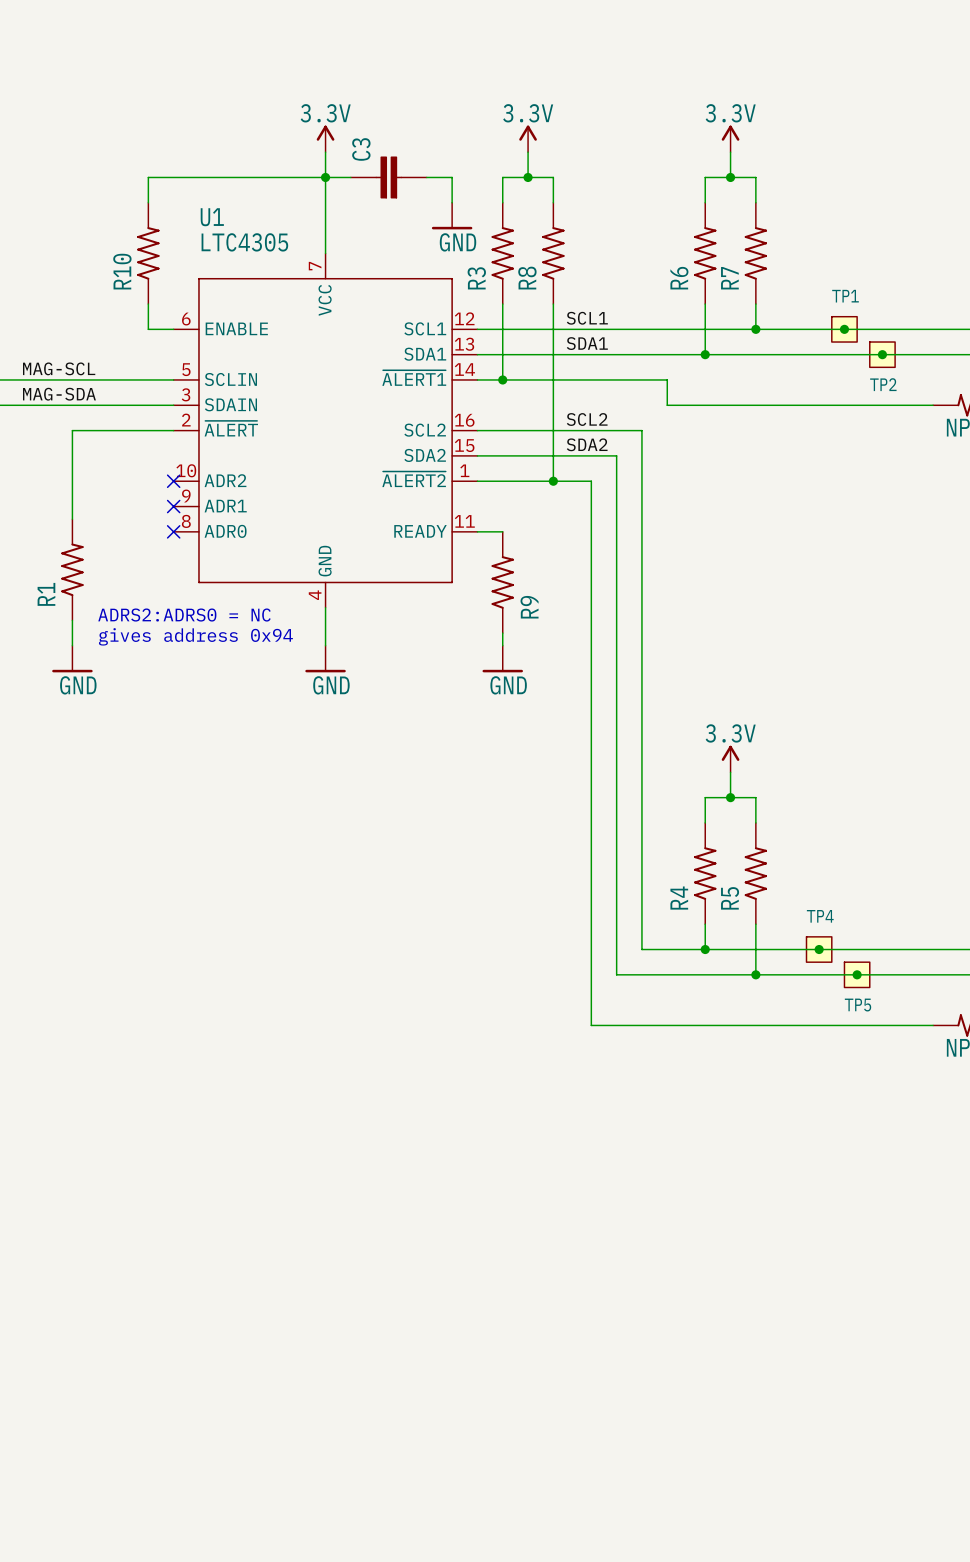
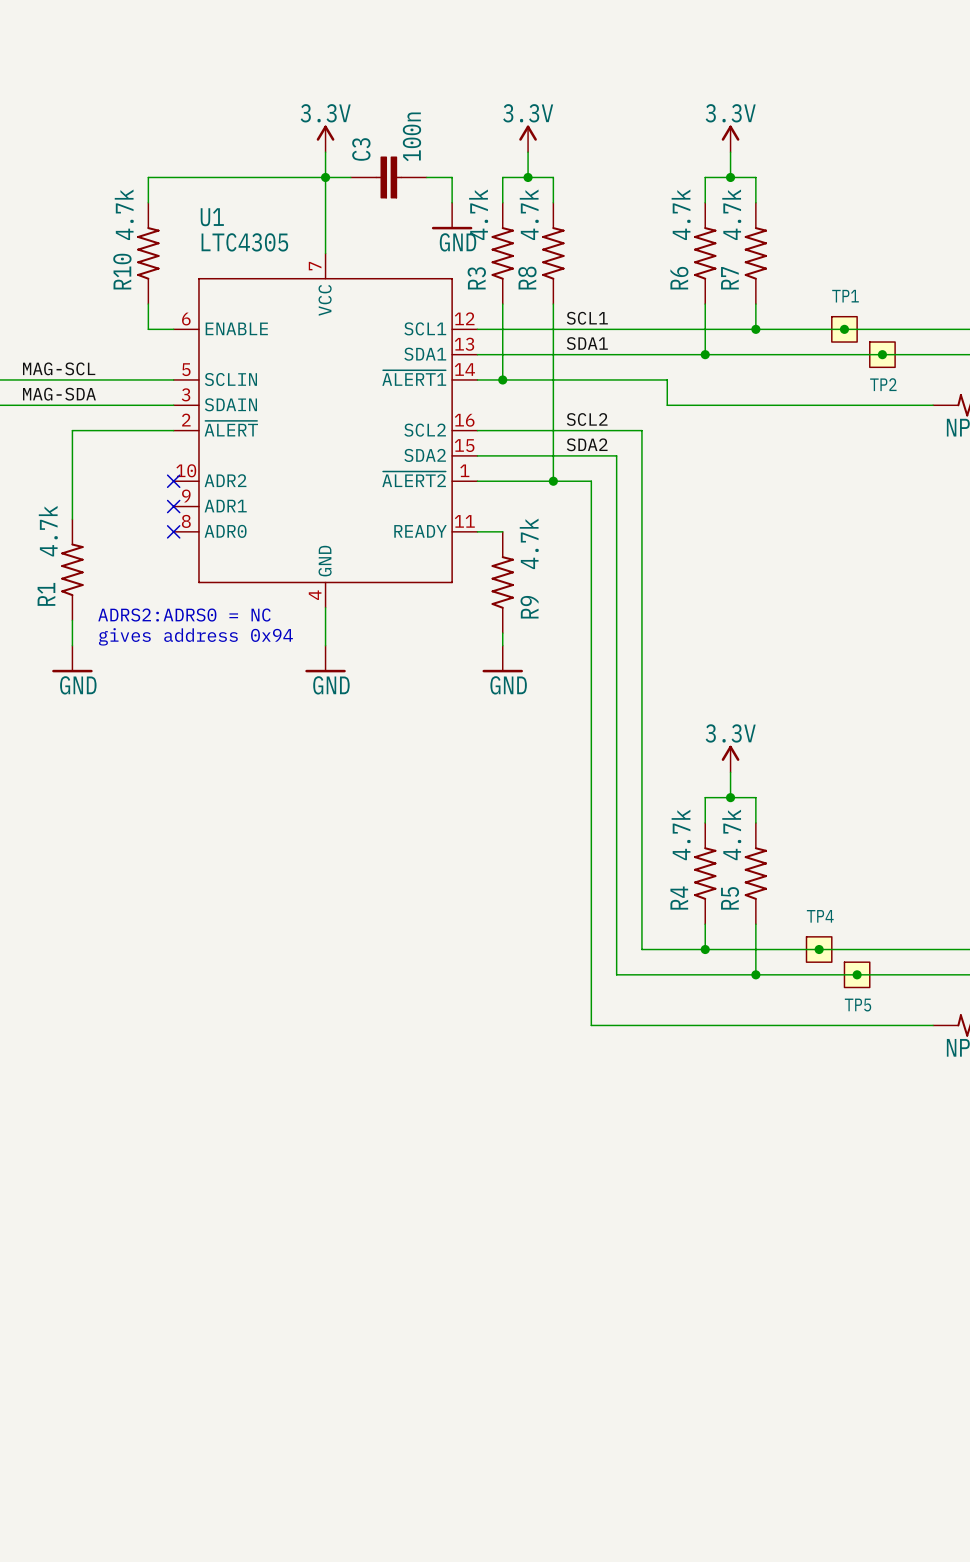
C3 value: none -> 100n (411, 136)
R10 value: none -> 4.7k (124, 214)
R3 value: none -> 4.7k (478, 214)
R8 value: none -> 4.7k (529, 214)
R6 value: none -> 4.7k (681, 214)
R7 value: none -> 4.7k (731, 214)
R1 value: none -> 4.7k (48, 531)
R9 value: none -> 4.7k (529, 543)
R4 value: none -> 4.7k (681, 834)
R5 value: none -> 4.7k (731, 834)

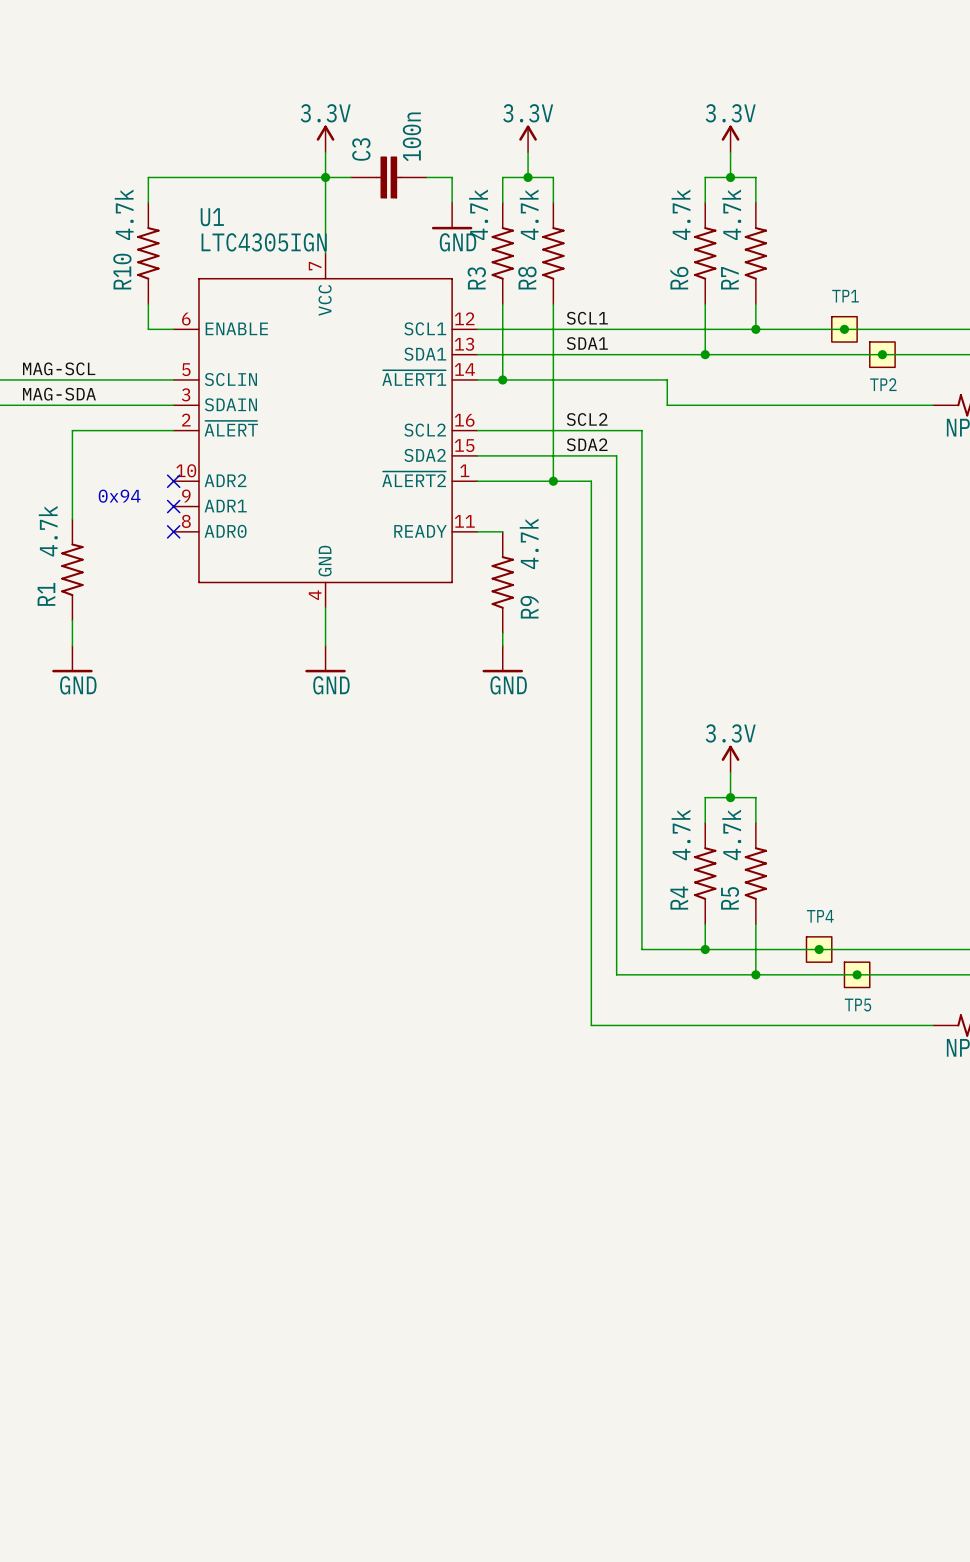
U1 value: LTC4305 (244, 242) -> LTC4305IGN (264, 242)
text: none -> 0x94 (119, 496)
text: ADRS2:ADRS0 = NC (184, 615) -> none
text: gives address 0x94 (195, 636) -> none

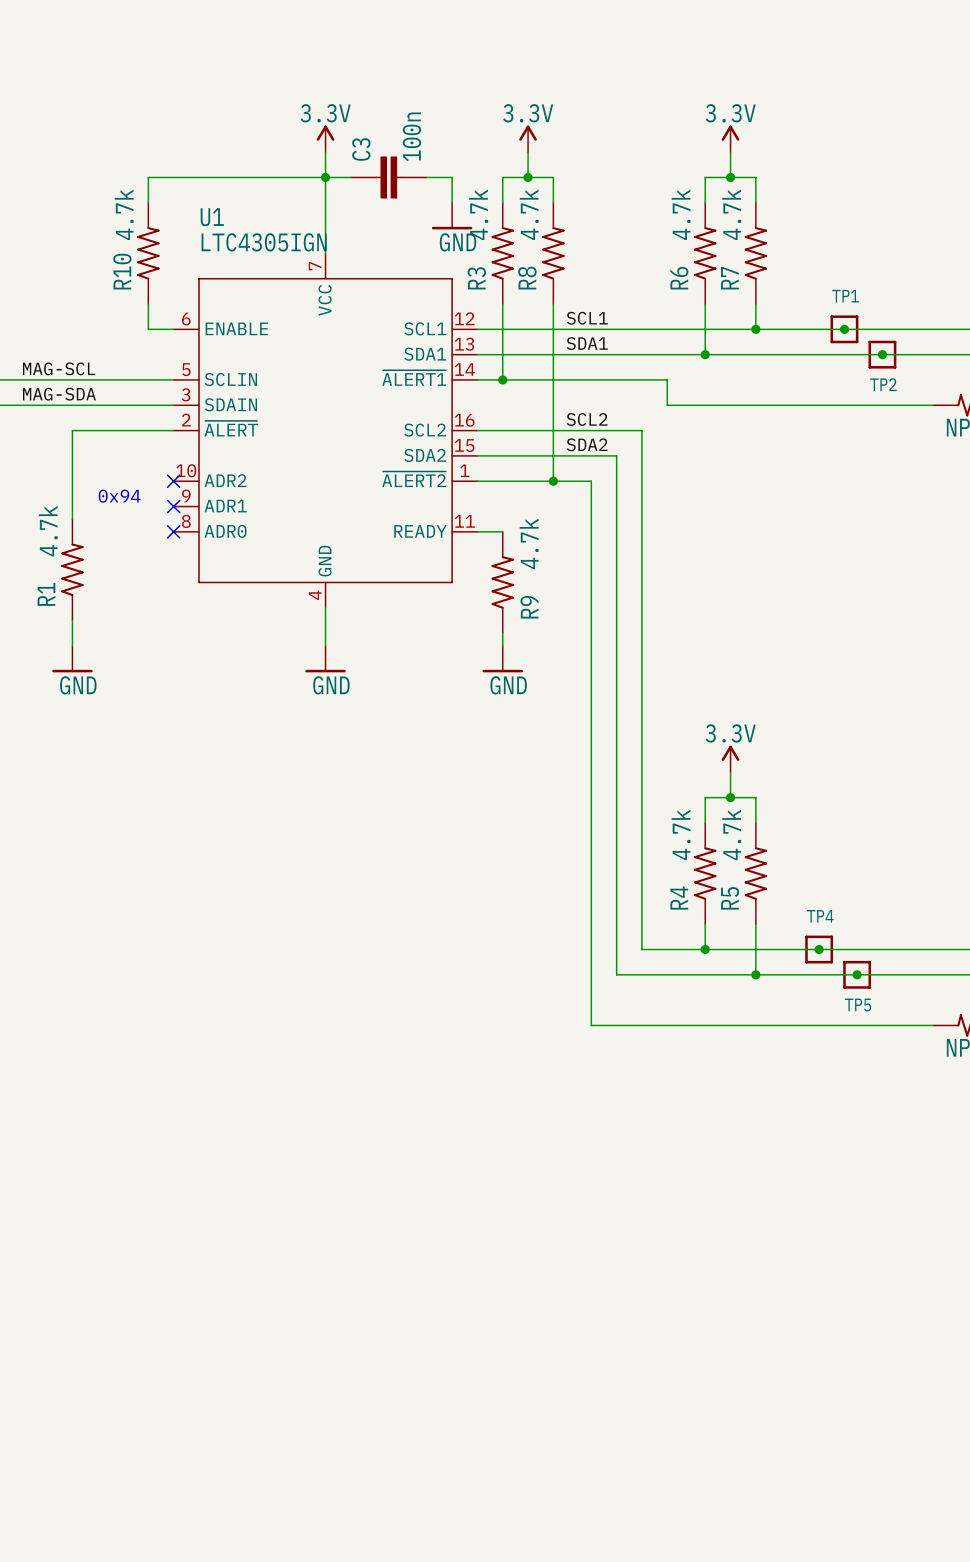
TP1 symbol: [831, 316, 858, 343] -> [830, 315, 859, 344]
TP2 symbol: [869, 342, 896, 368] -> [868, 340, 897, 369]
TP4 symbol: [806, 936, 832, 963] -> [805, 935, 834, 964]
TP5 symbol: [844, 962, 870, 988] -> [843, 960, 872, 989]

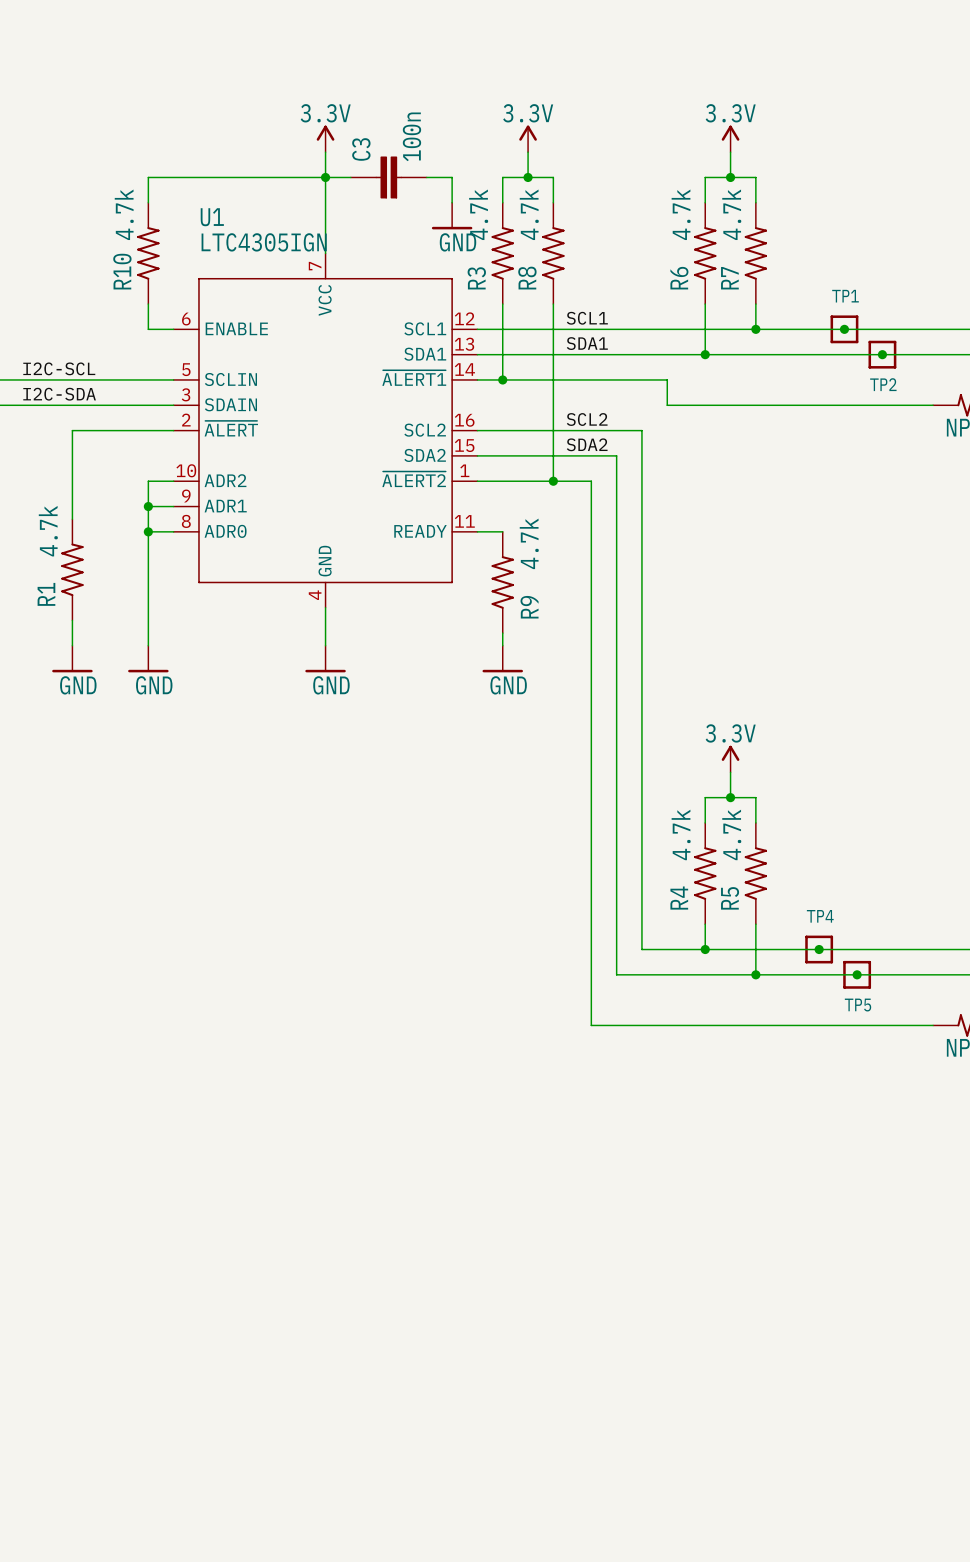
label: MAG-SCL (59, 368) -> I2C-SCL (59, 368)
label: MAG-SDA (59, 394) -> I2C-SDA (59, 394)
wire: none -> (173, 481) (148, 481) (148, 645)
no-connect mark: (173, 481) -> none
text: 0x94 (119, 496) -> none
wire: none -> (148, 506) (173, 506)
junction: none -> (148, 506)
no-connect mark: (173, 506) -> none
wire: none -> (148, 531) (173, 531)
junction: none -> (148, 531)
no-connect mark: (173, 531) -> none
power symbol: none -> GND (148, 659)

